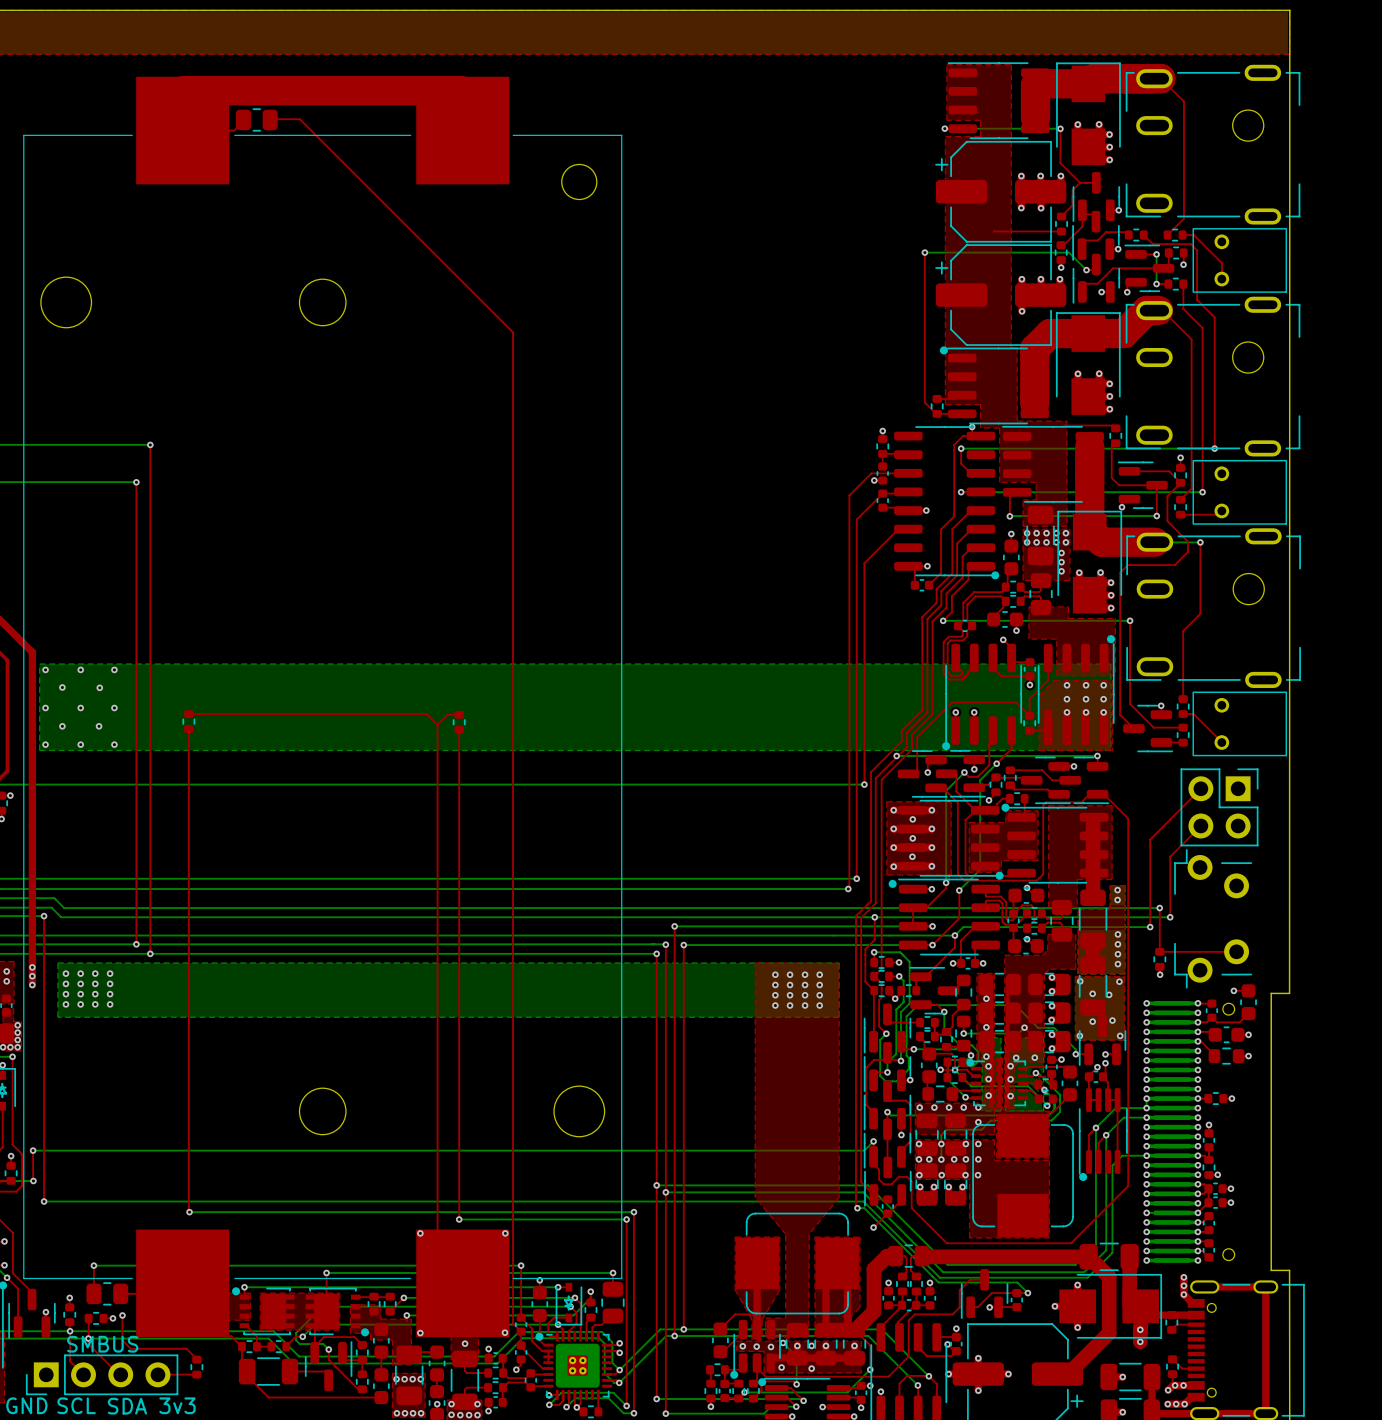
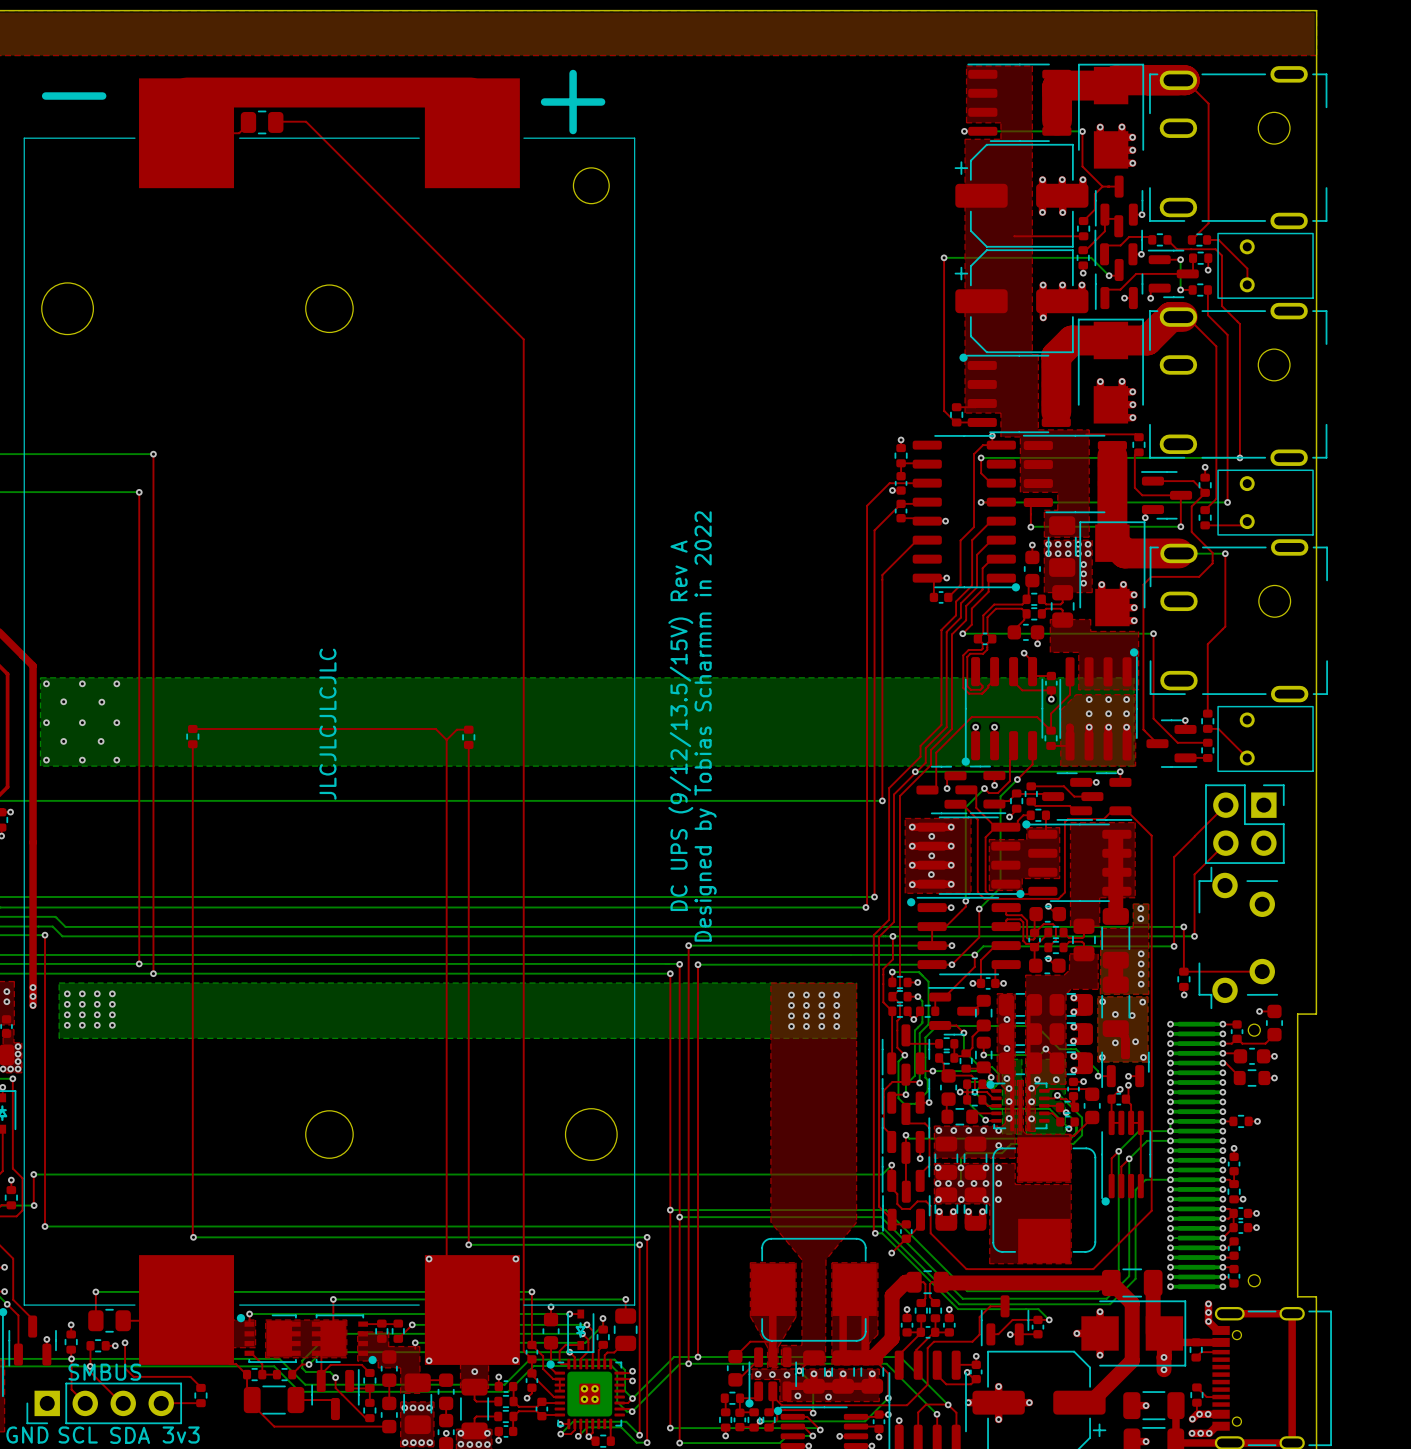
text: none -> - (74, 96)
text: none -> + (573, 102)
text: none -> JLCJLCJLCJLC (327, 724)
text: none -> DC UPS (9/12/13.5/15V) Rev A (680, 725)
text: none -> Designed by Tobias Scharmm in 2022 (705, 726)

